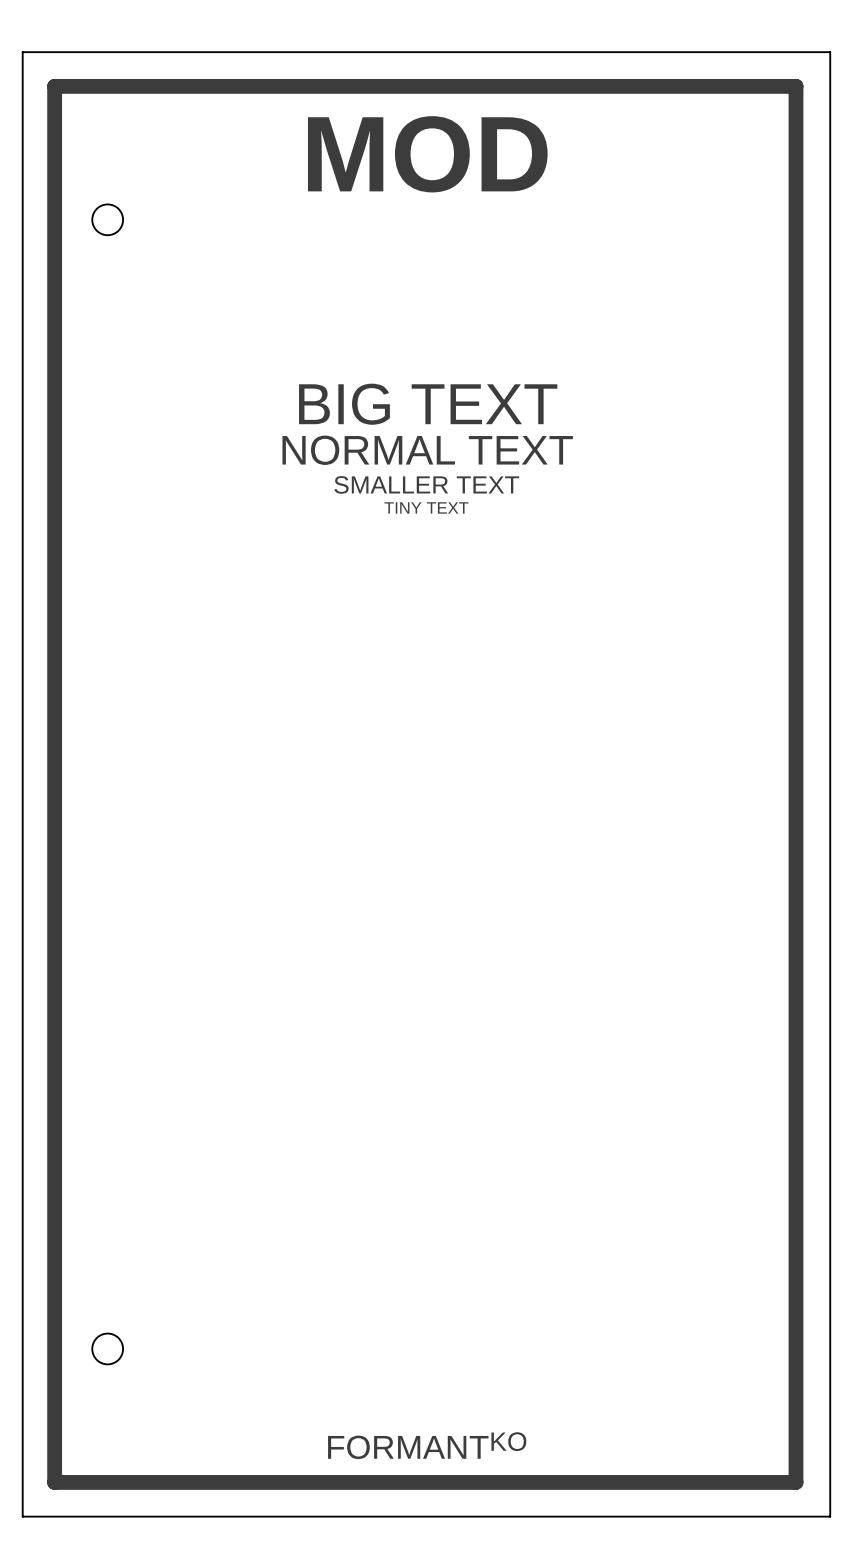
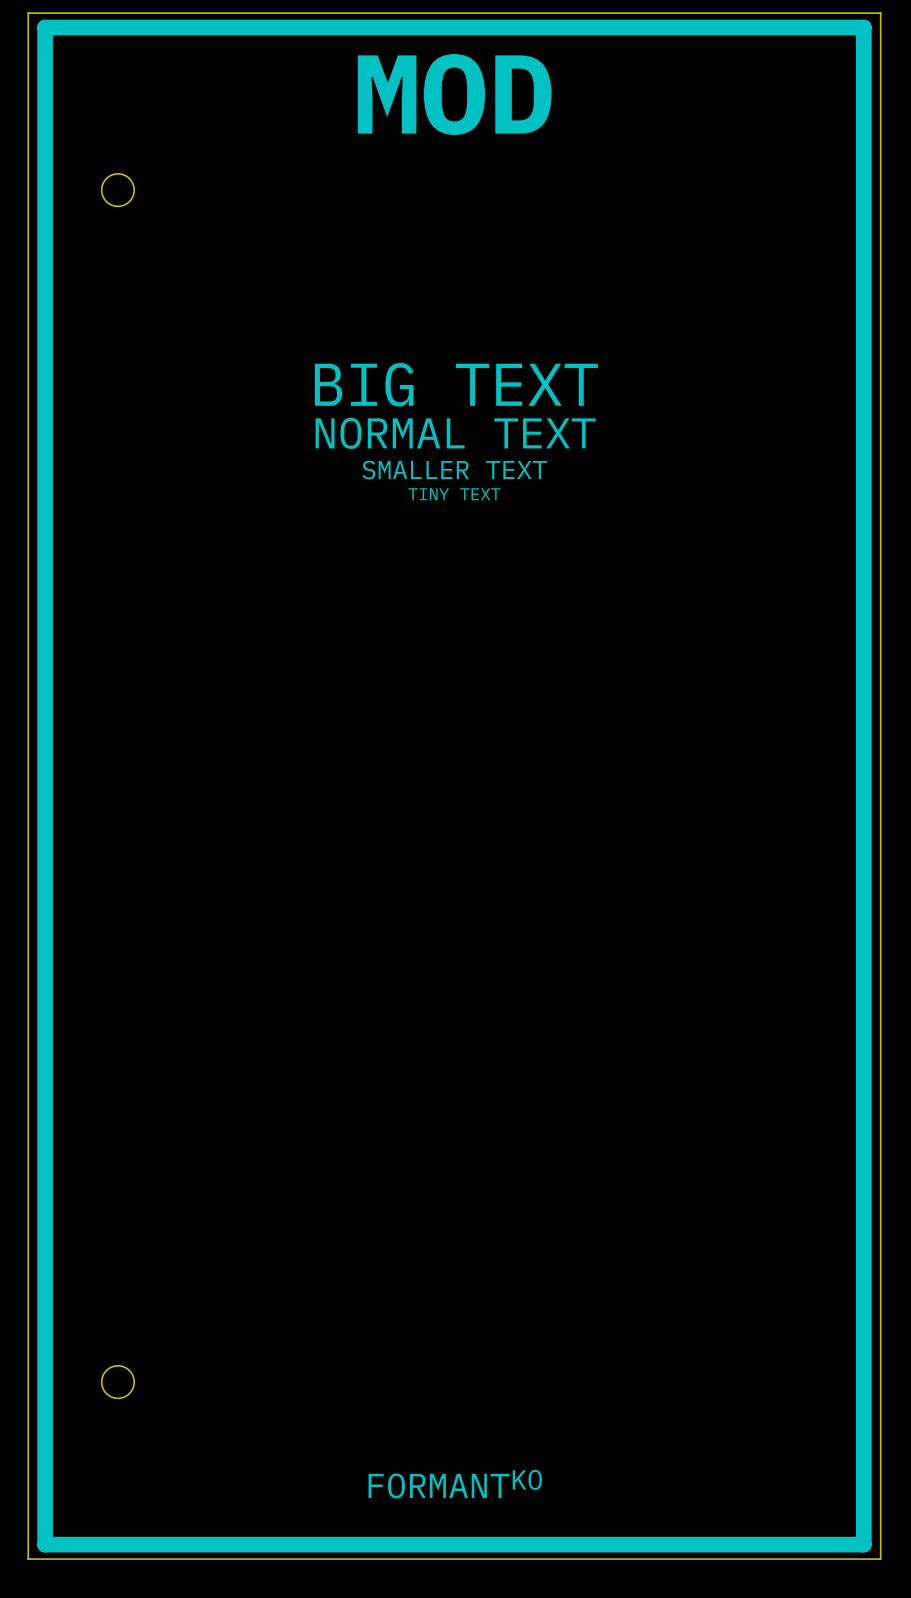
line: (54, 86) (796, 86) (796, 1482) (54, 1482) (54, 86) -> (45, 27) (45, 1544) (863, 1544) (863, 27) (45, 27)
text position: MOD (427, 154) -> MOD (454, 94)

